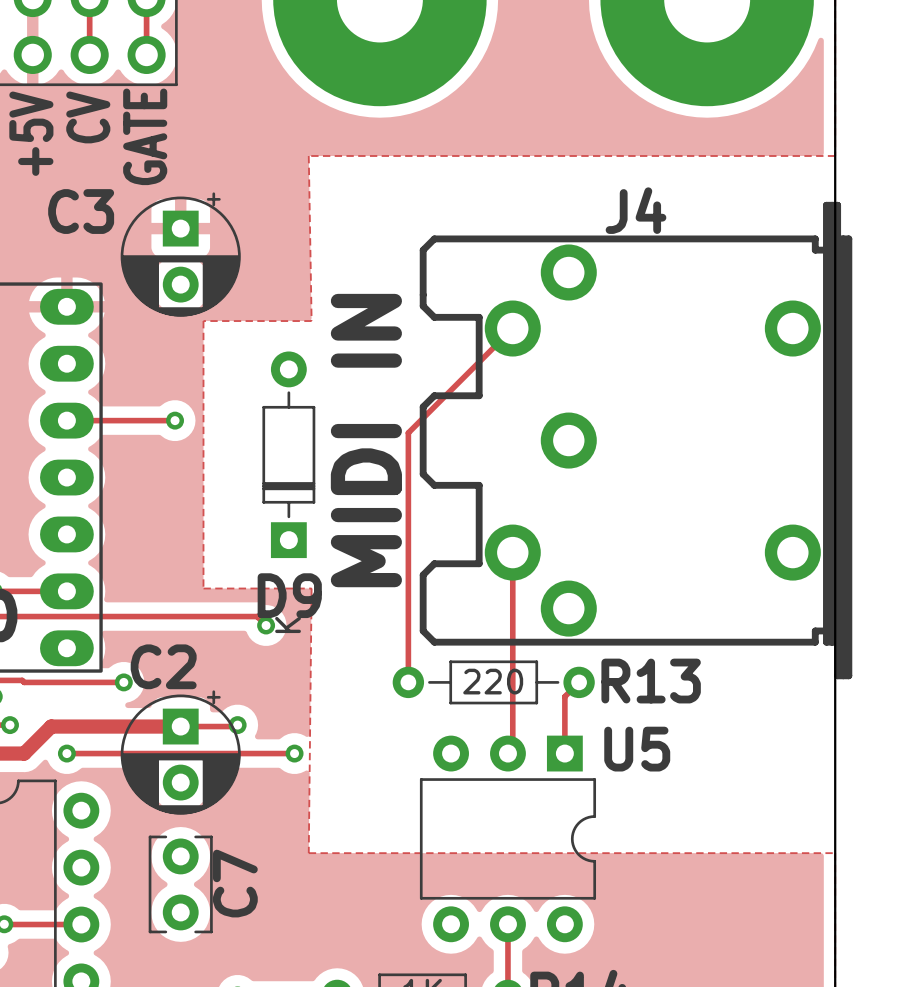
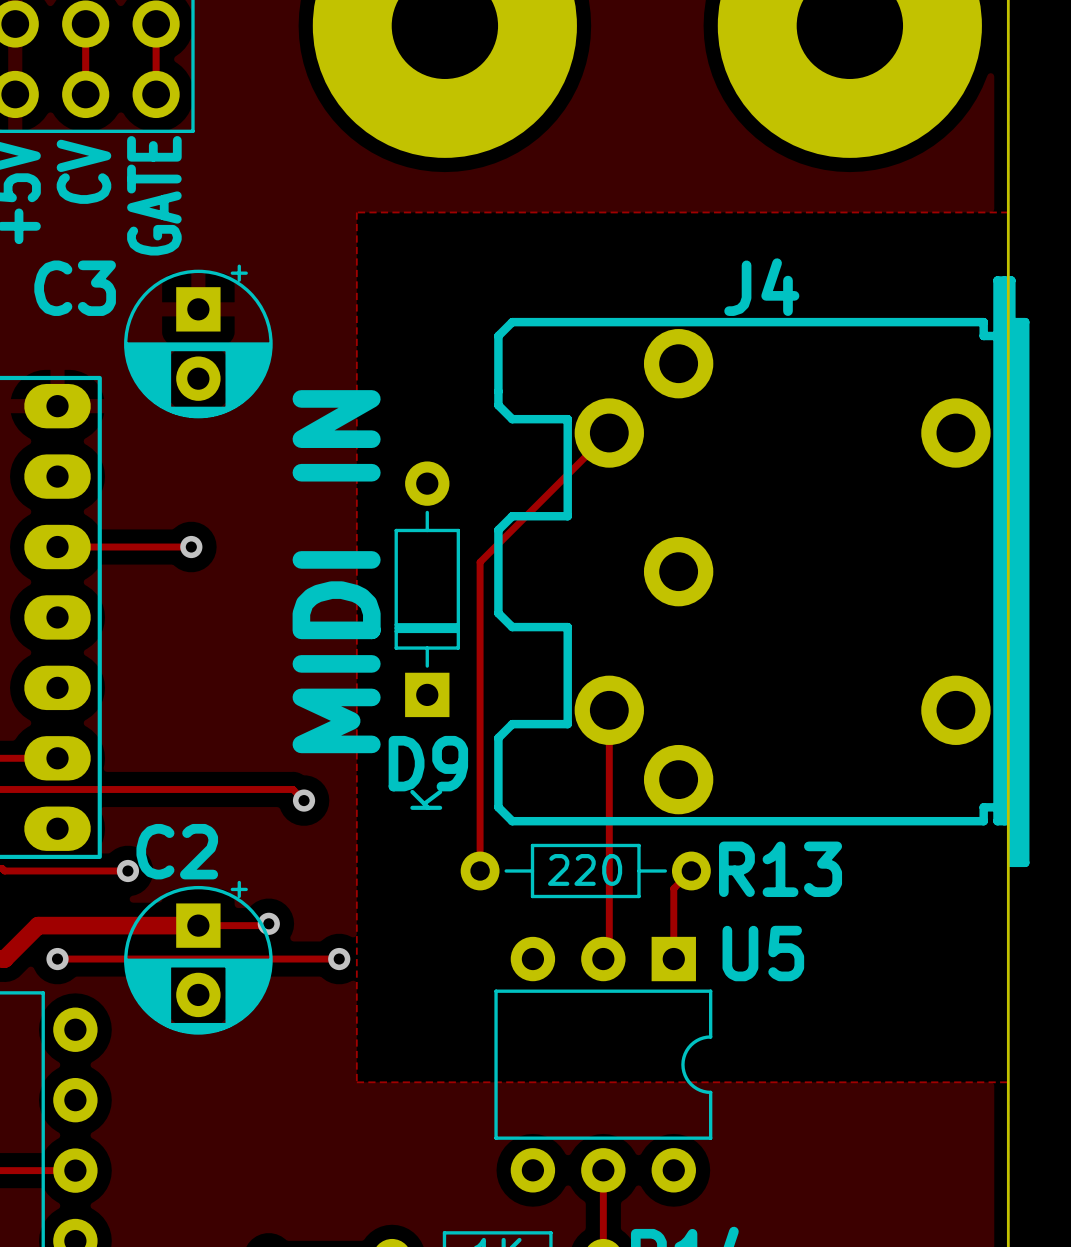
zone outline: (835, 150) (835, 155) (308, 155) (311, 321) (203, 321) (203, 588) (311, 588) (308, 853) -> (1008, 212) (356, 212) (356, 1082)
text position: MIDI IN (366, 440) -> MIDI IN (336, 571)
D9 position: (288, 454) -> (427, 589)
C7: (180, 884) -> none

